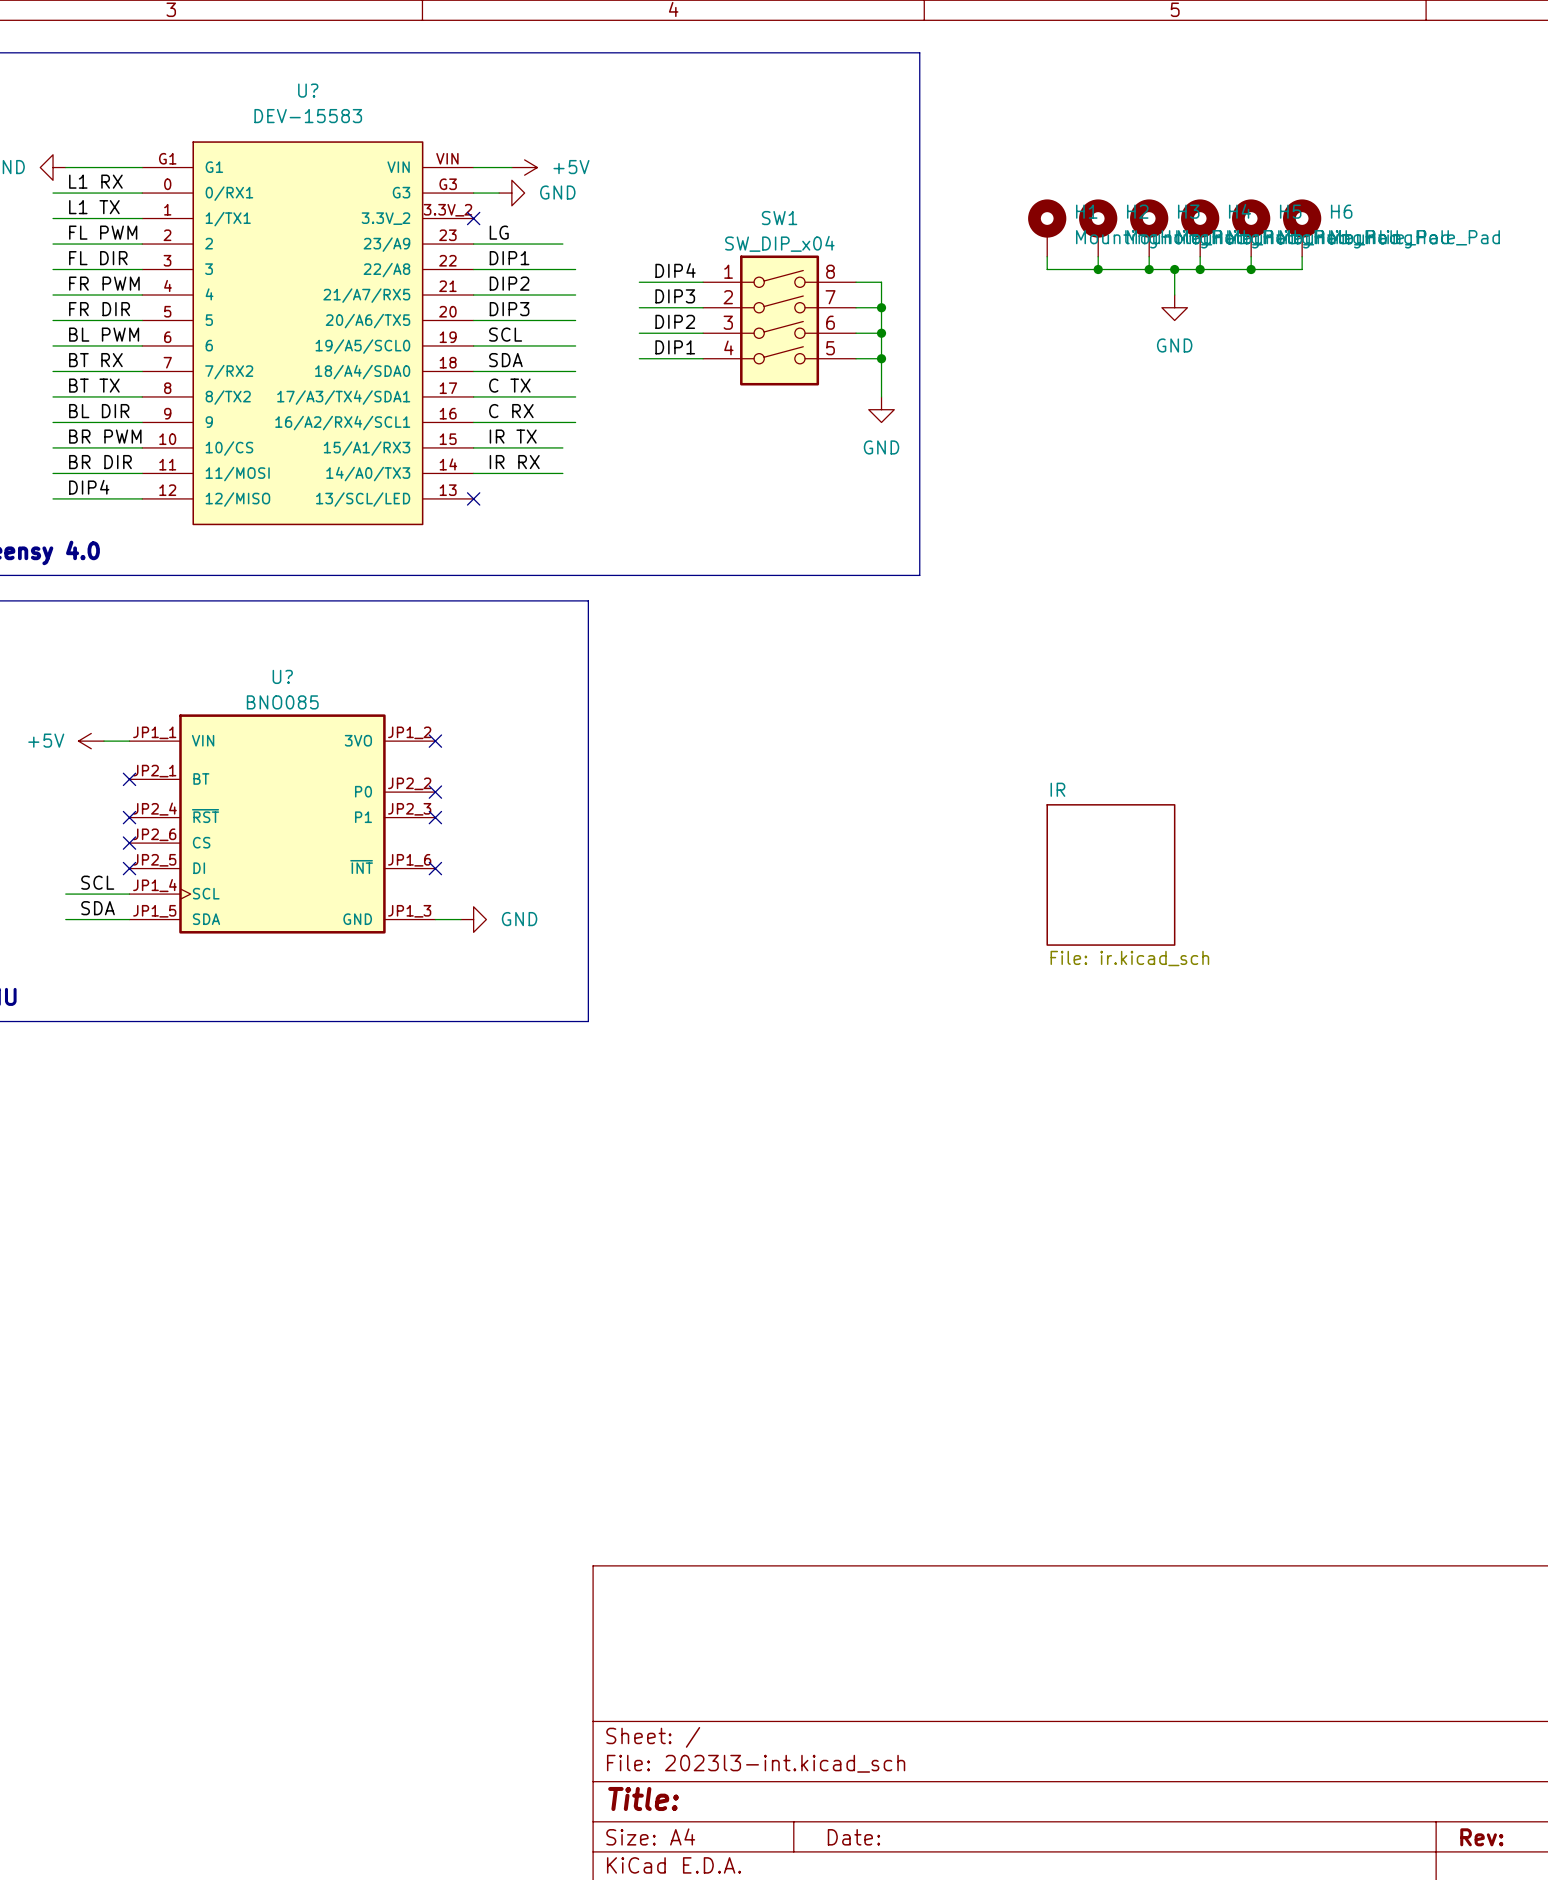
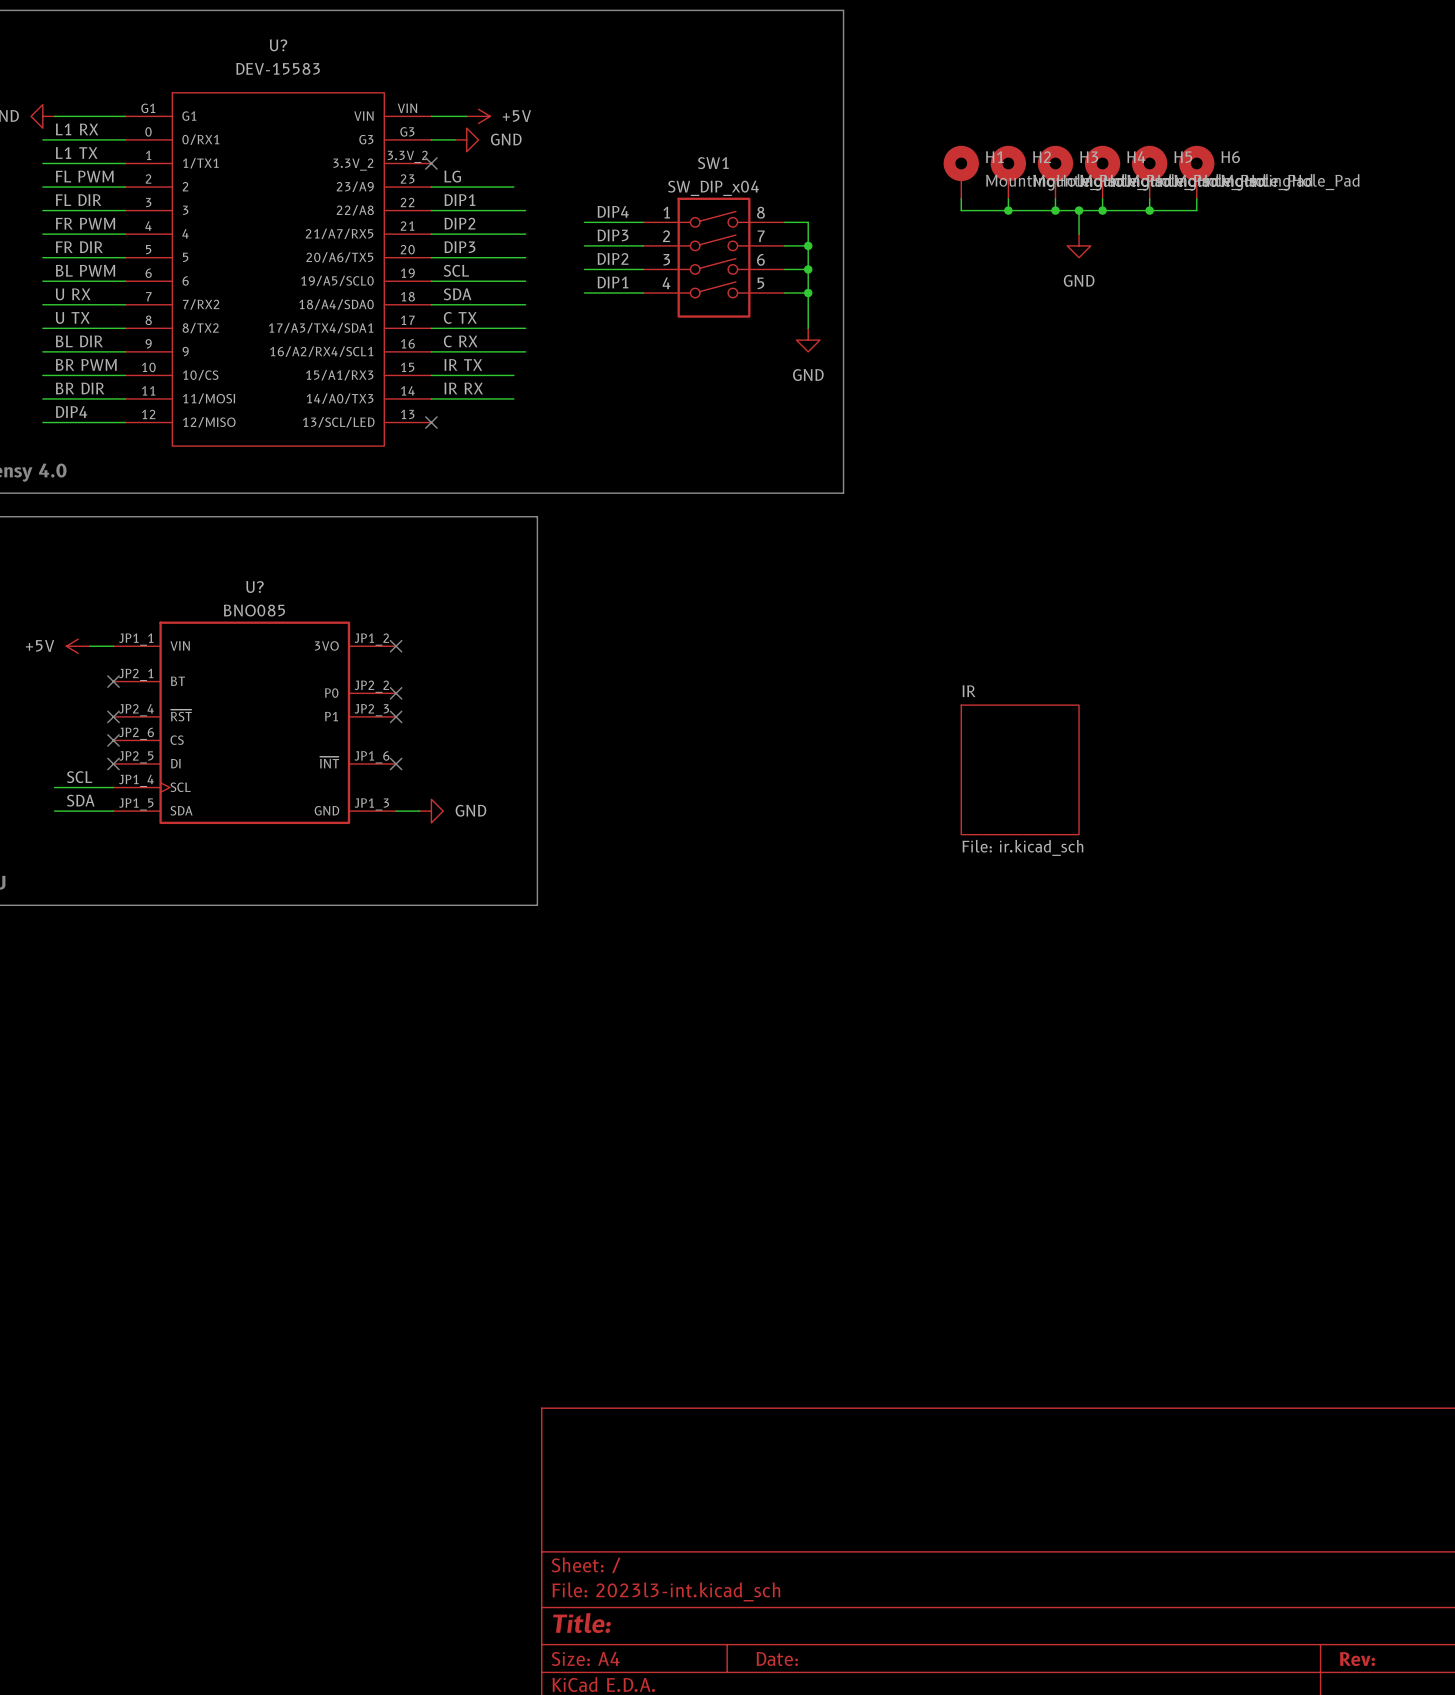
label: BT RX (95, 360) -> U RX (73, 294)
label: BT TX (94, 385) -> U TX (72, 317)

